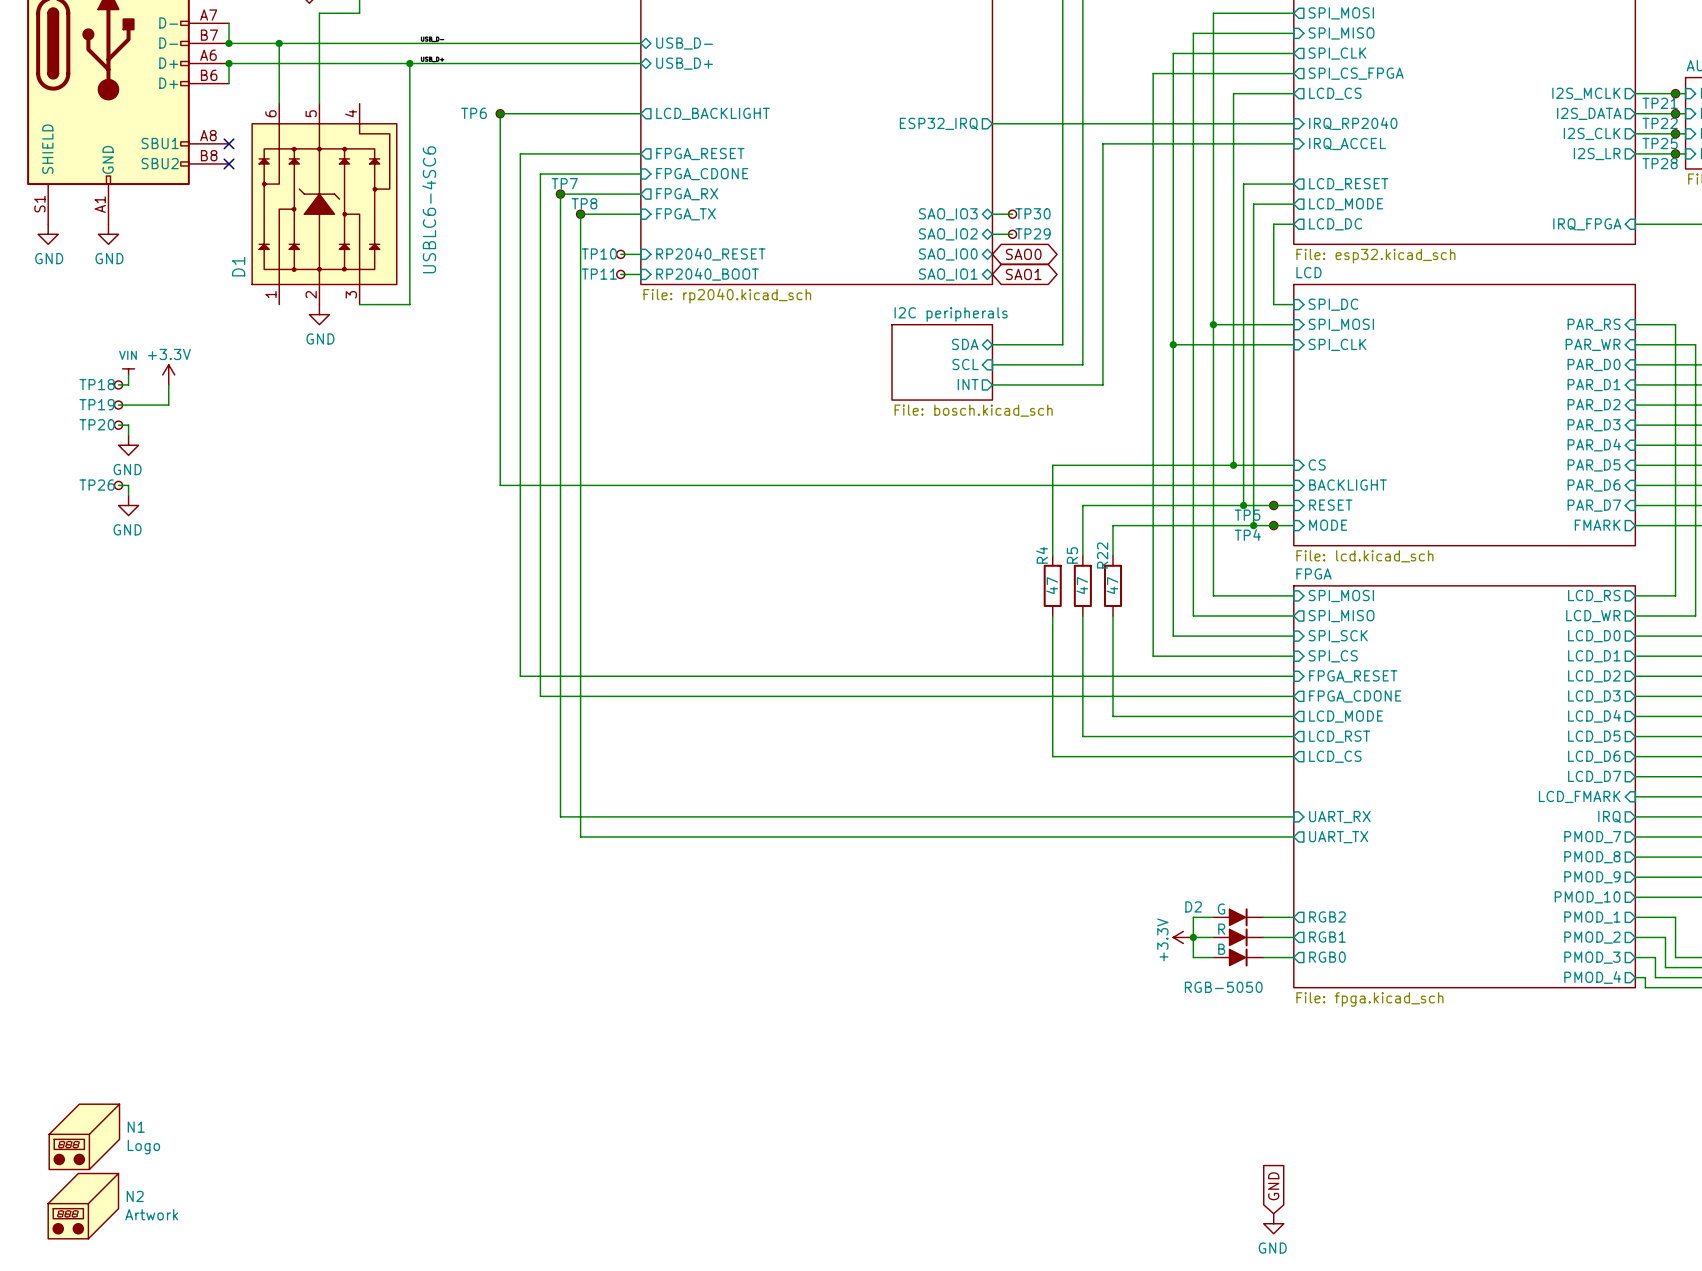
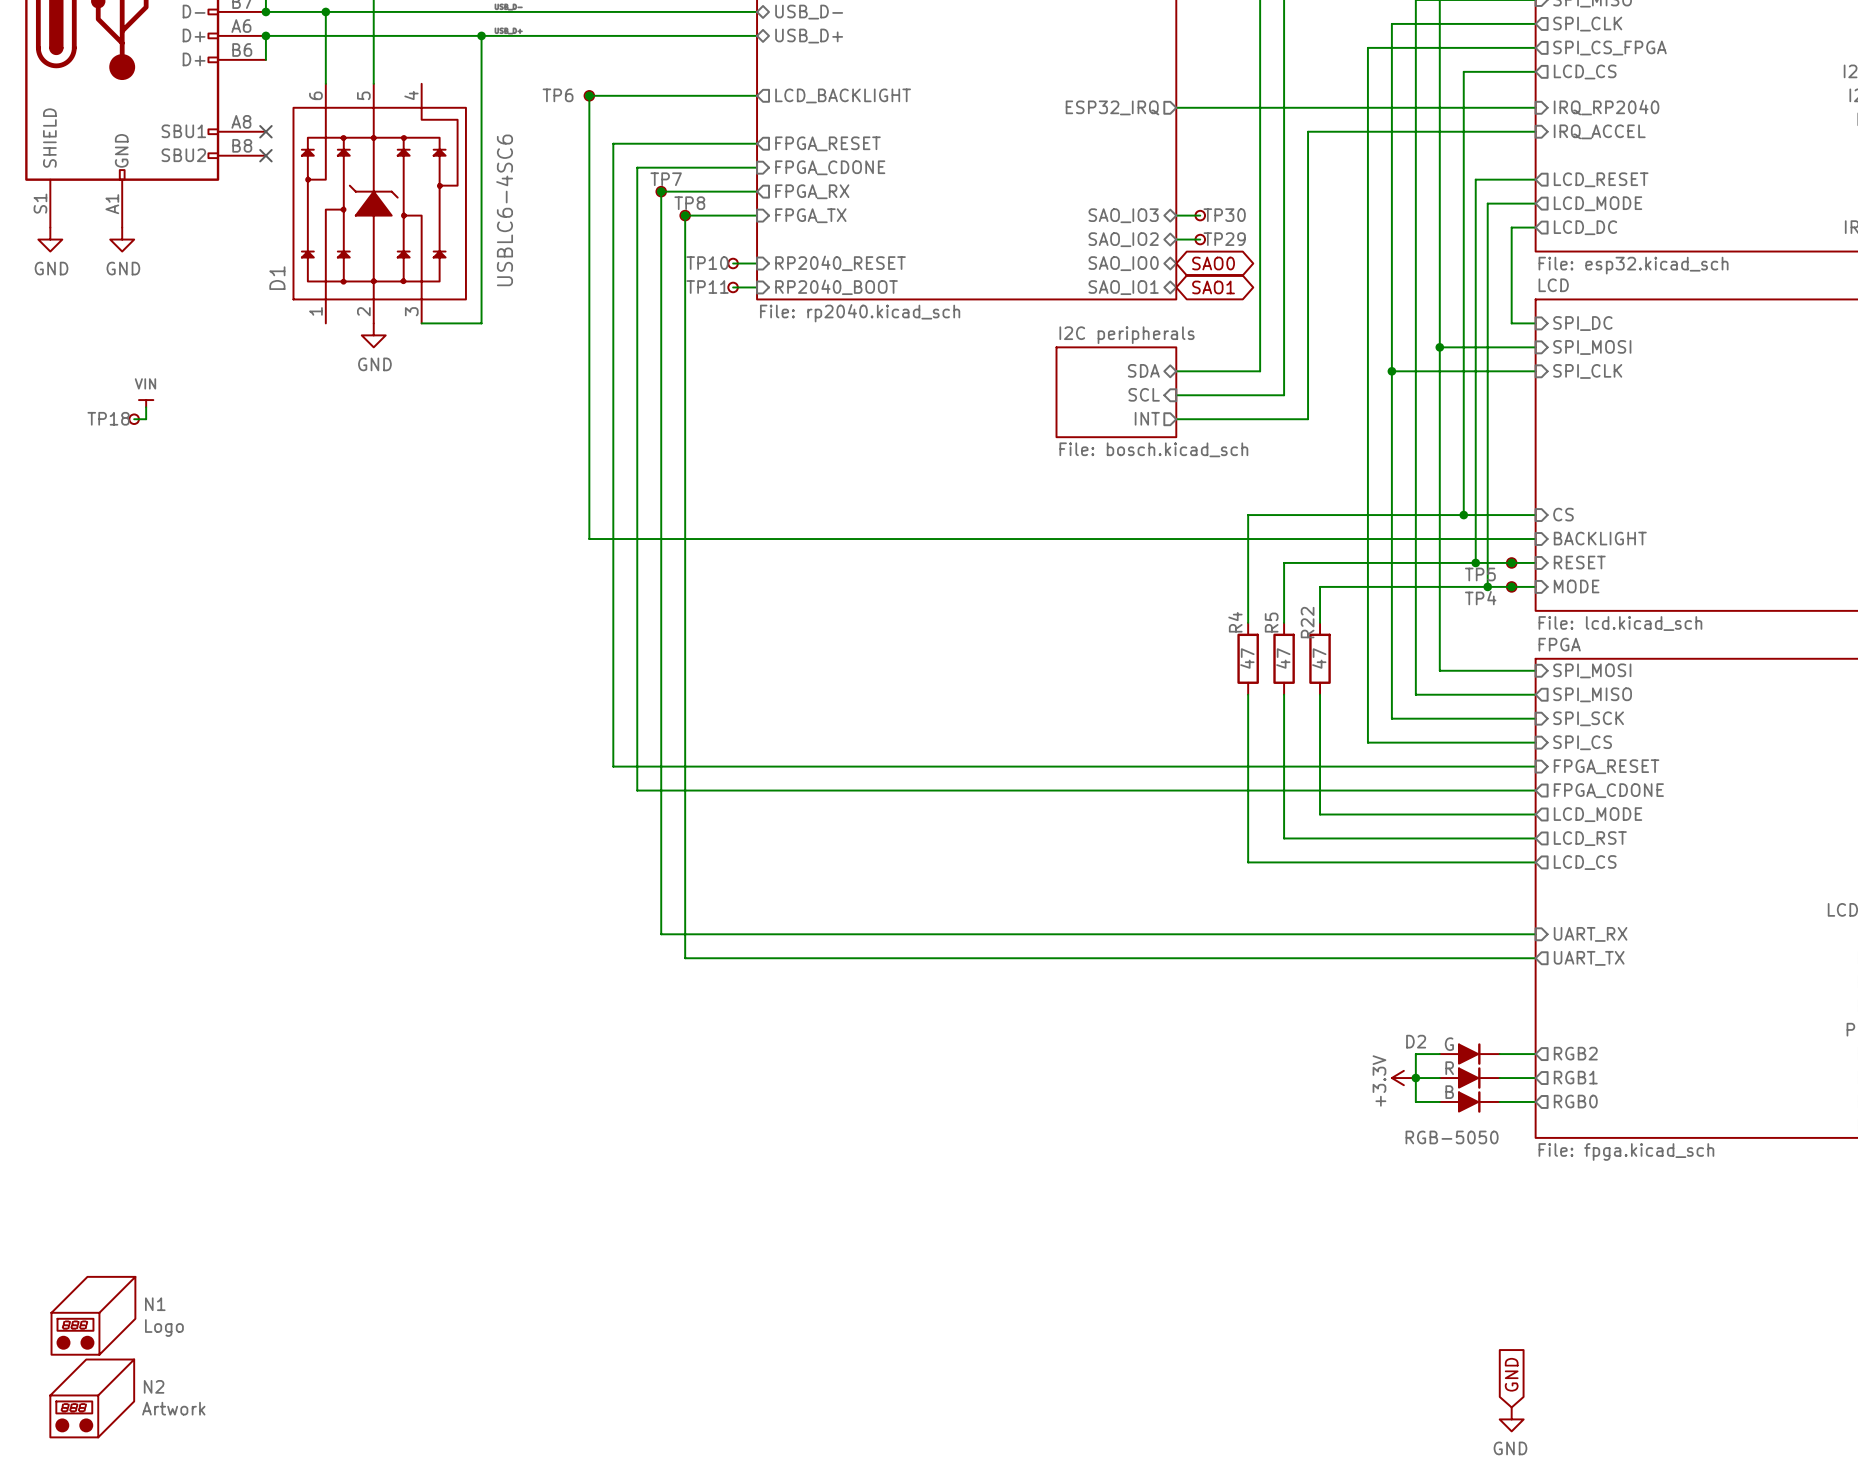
power symbol: +3.3V (168, 374) -> none
wire: (168, 384) (168, 405) (118, 405) -> none
TP19: (118, 405) -> none
wire: (118, 425) (128, 425) (128, 435) -> none
TP20: (118, 425) -> none
power symbol: GND (128, 445) -> none
wire: (118, 485) (128, 485) (128, 495) -> none
TP26: (118, 485) -> none
power symbol: GND (128, 505) -> none

